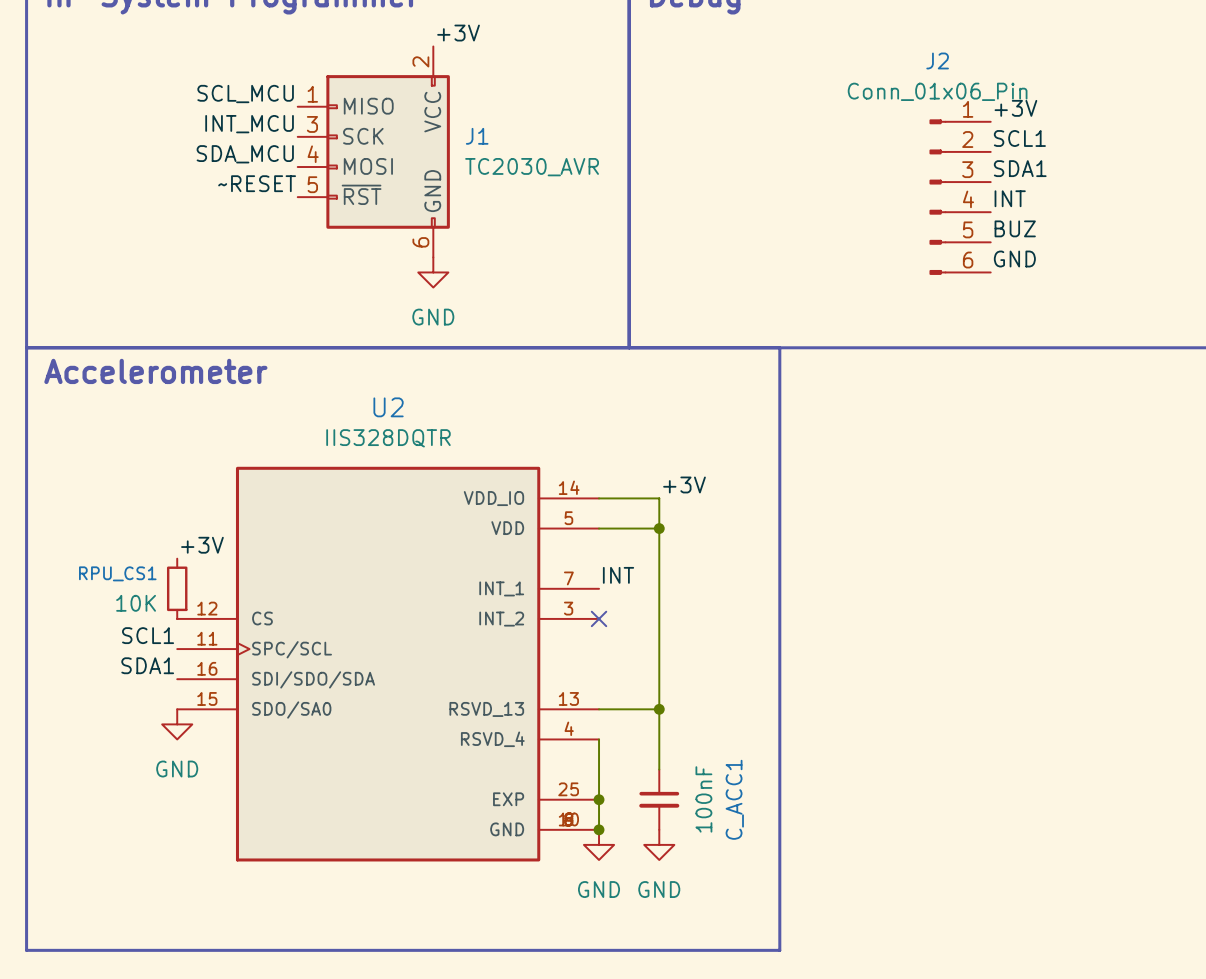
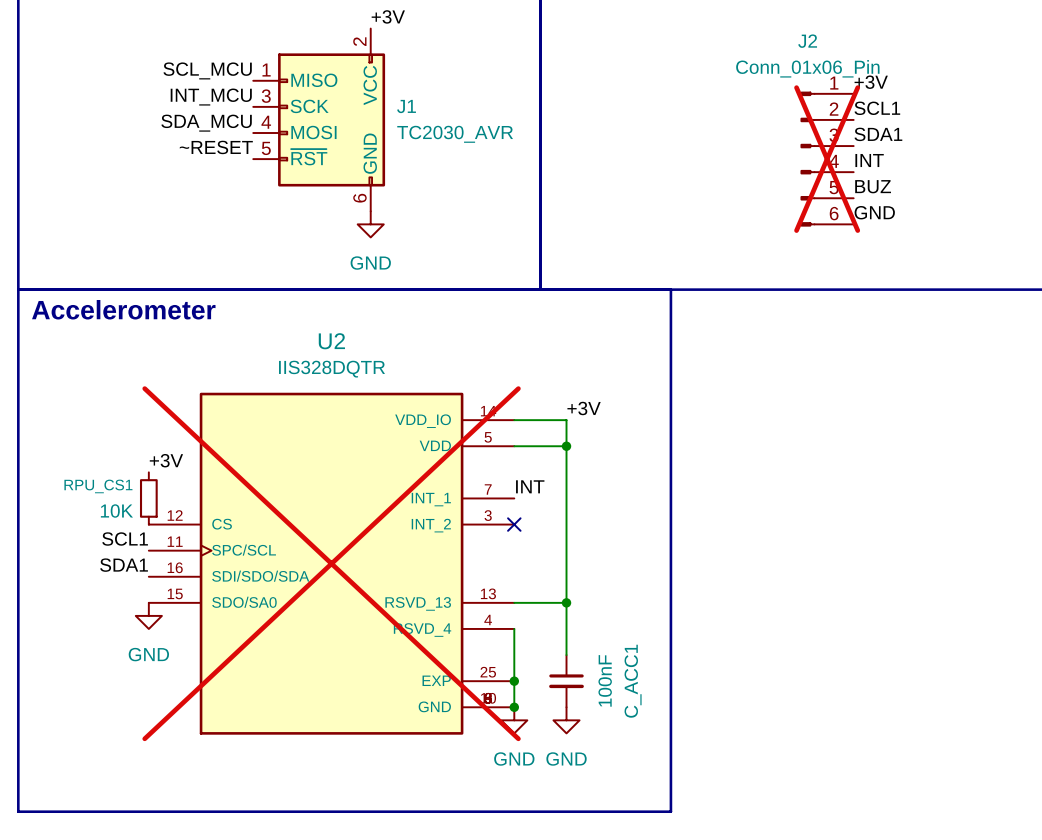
J2 do-not-place cross: none -> (827, 159)
U2 do-not-place cross: none -> (331, 563)

